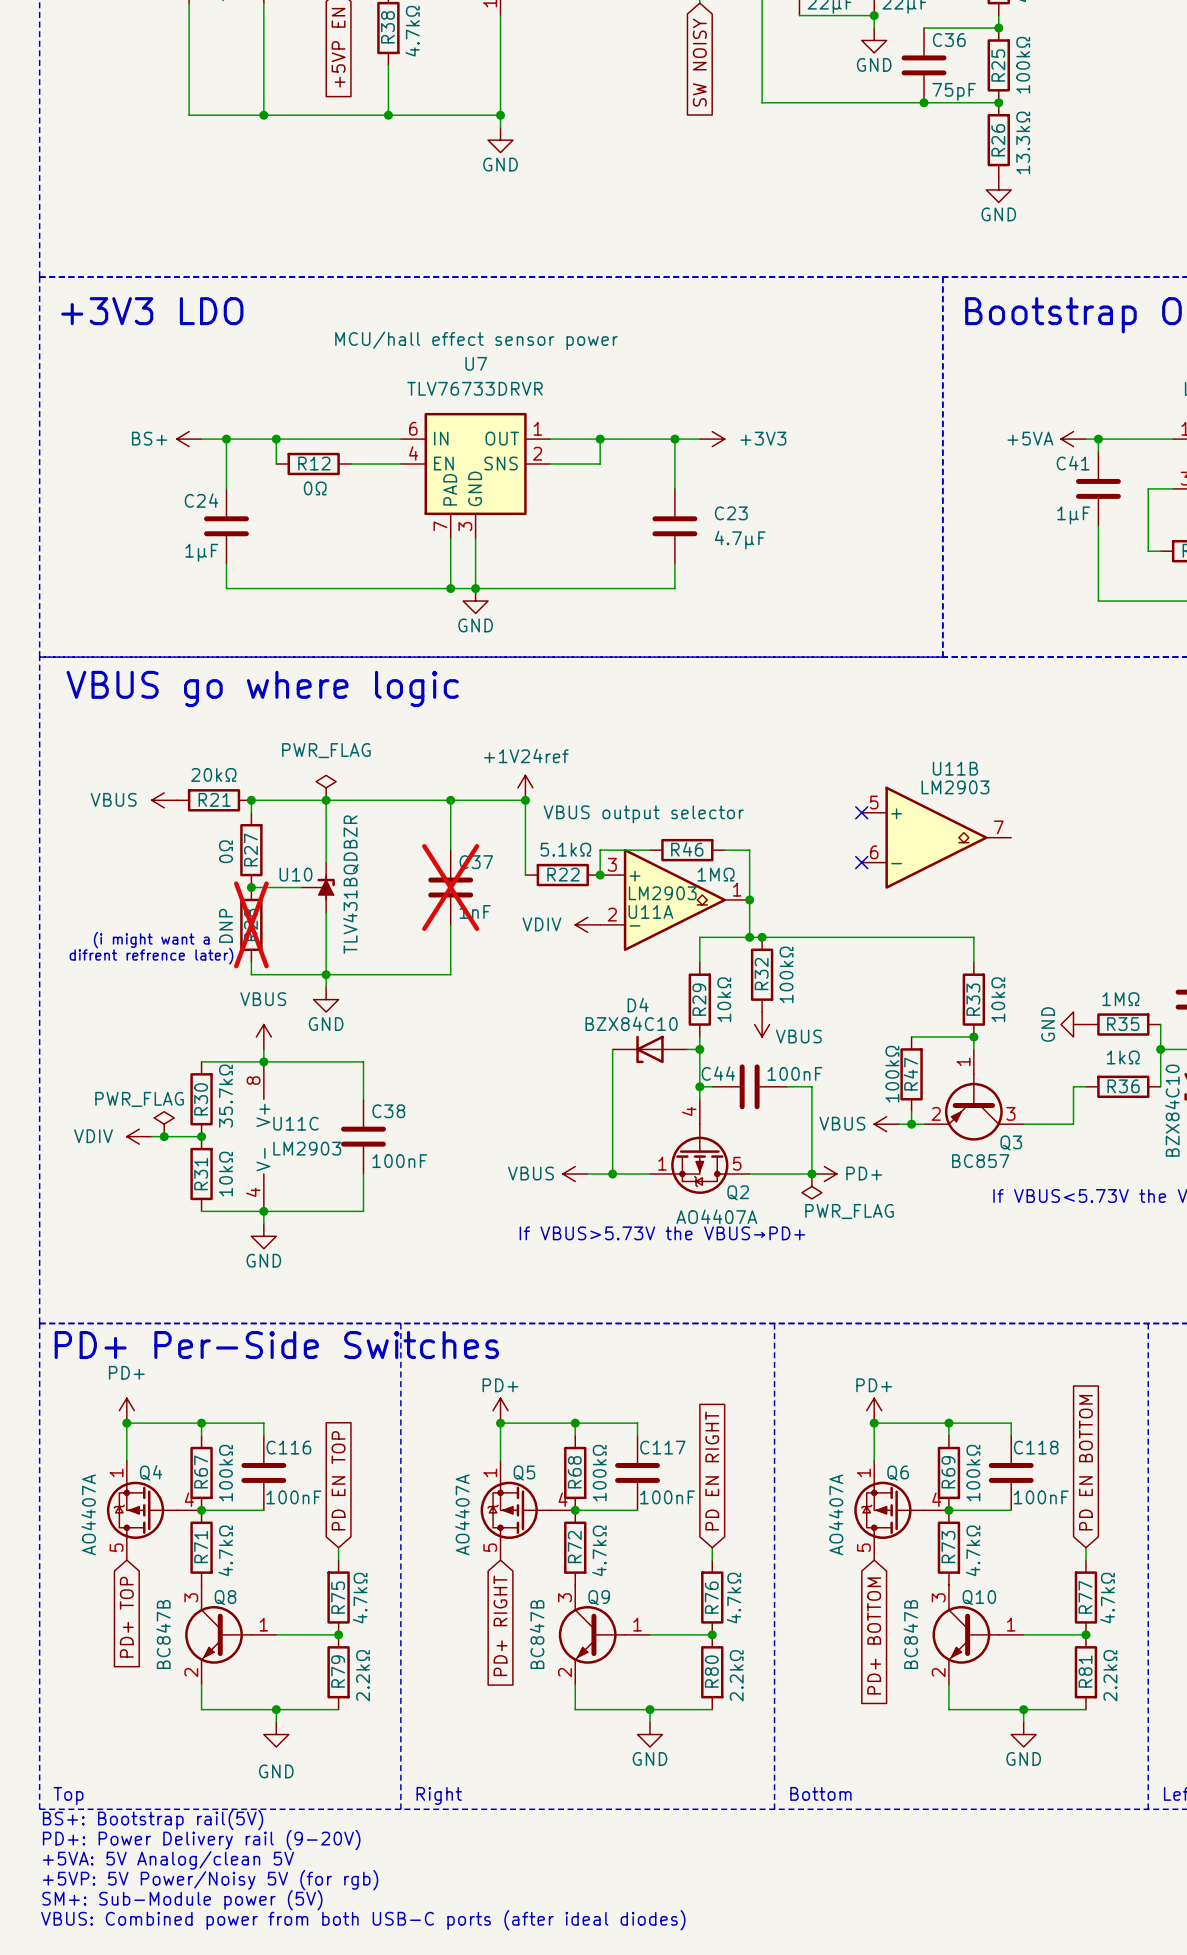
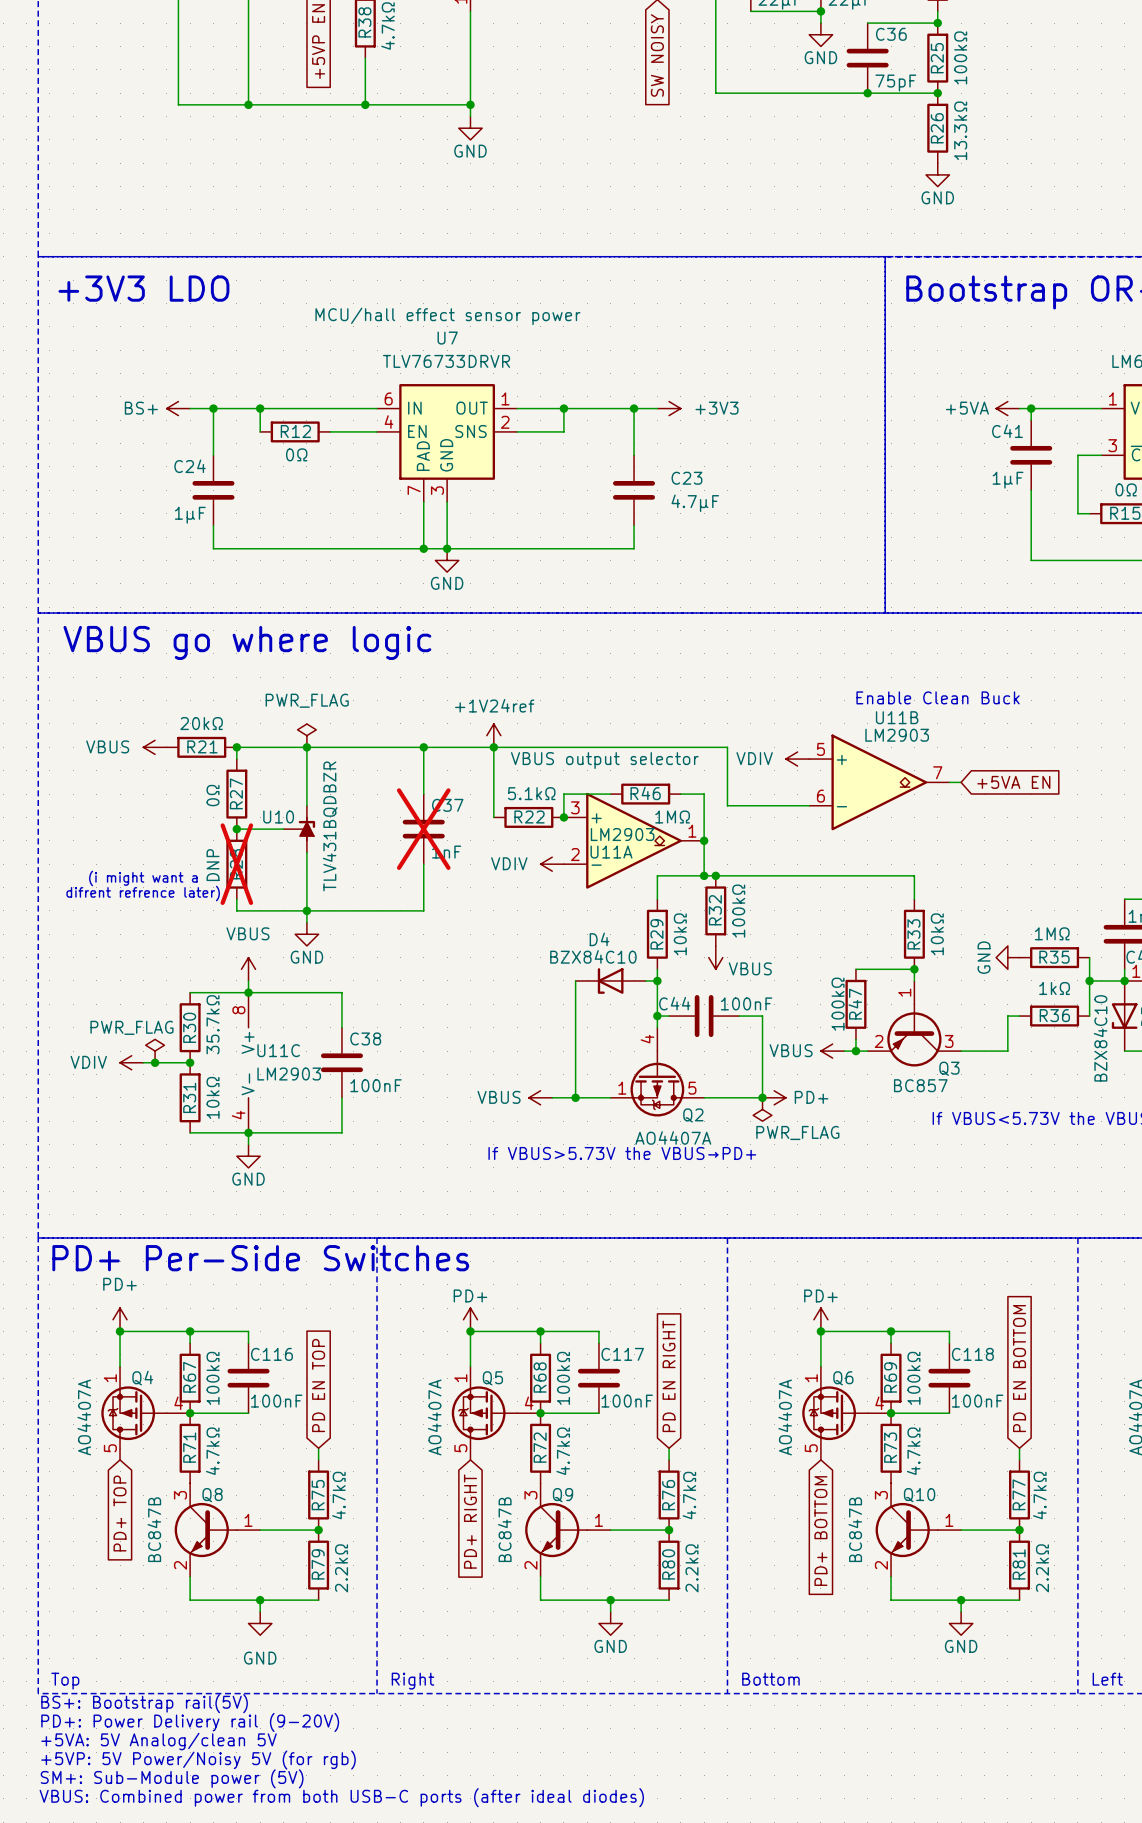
text: none -> Enable Clean Buck (938, 697)
wire: none -> (493, 747) (727, 747) (727, 805) (809, 805)
power symbol: none -> VDIV (797, 759)
no-connect mark: (861, 812) -> none
wire: none -> (949, 782) (961, 782)
global label: none -> +5VA EN (1013, 782)
no-connect mark: (861, 862) -> none

